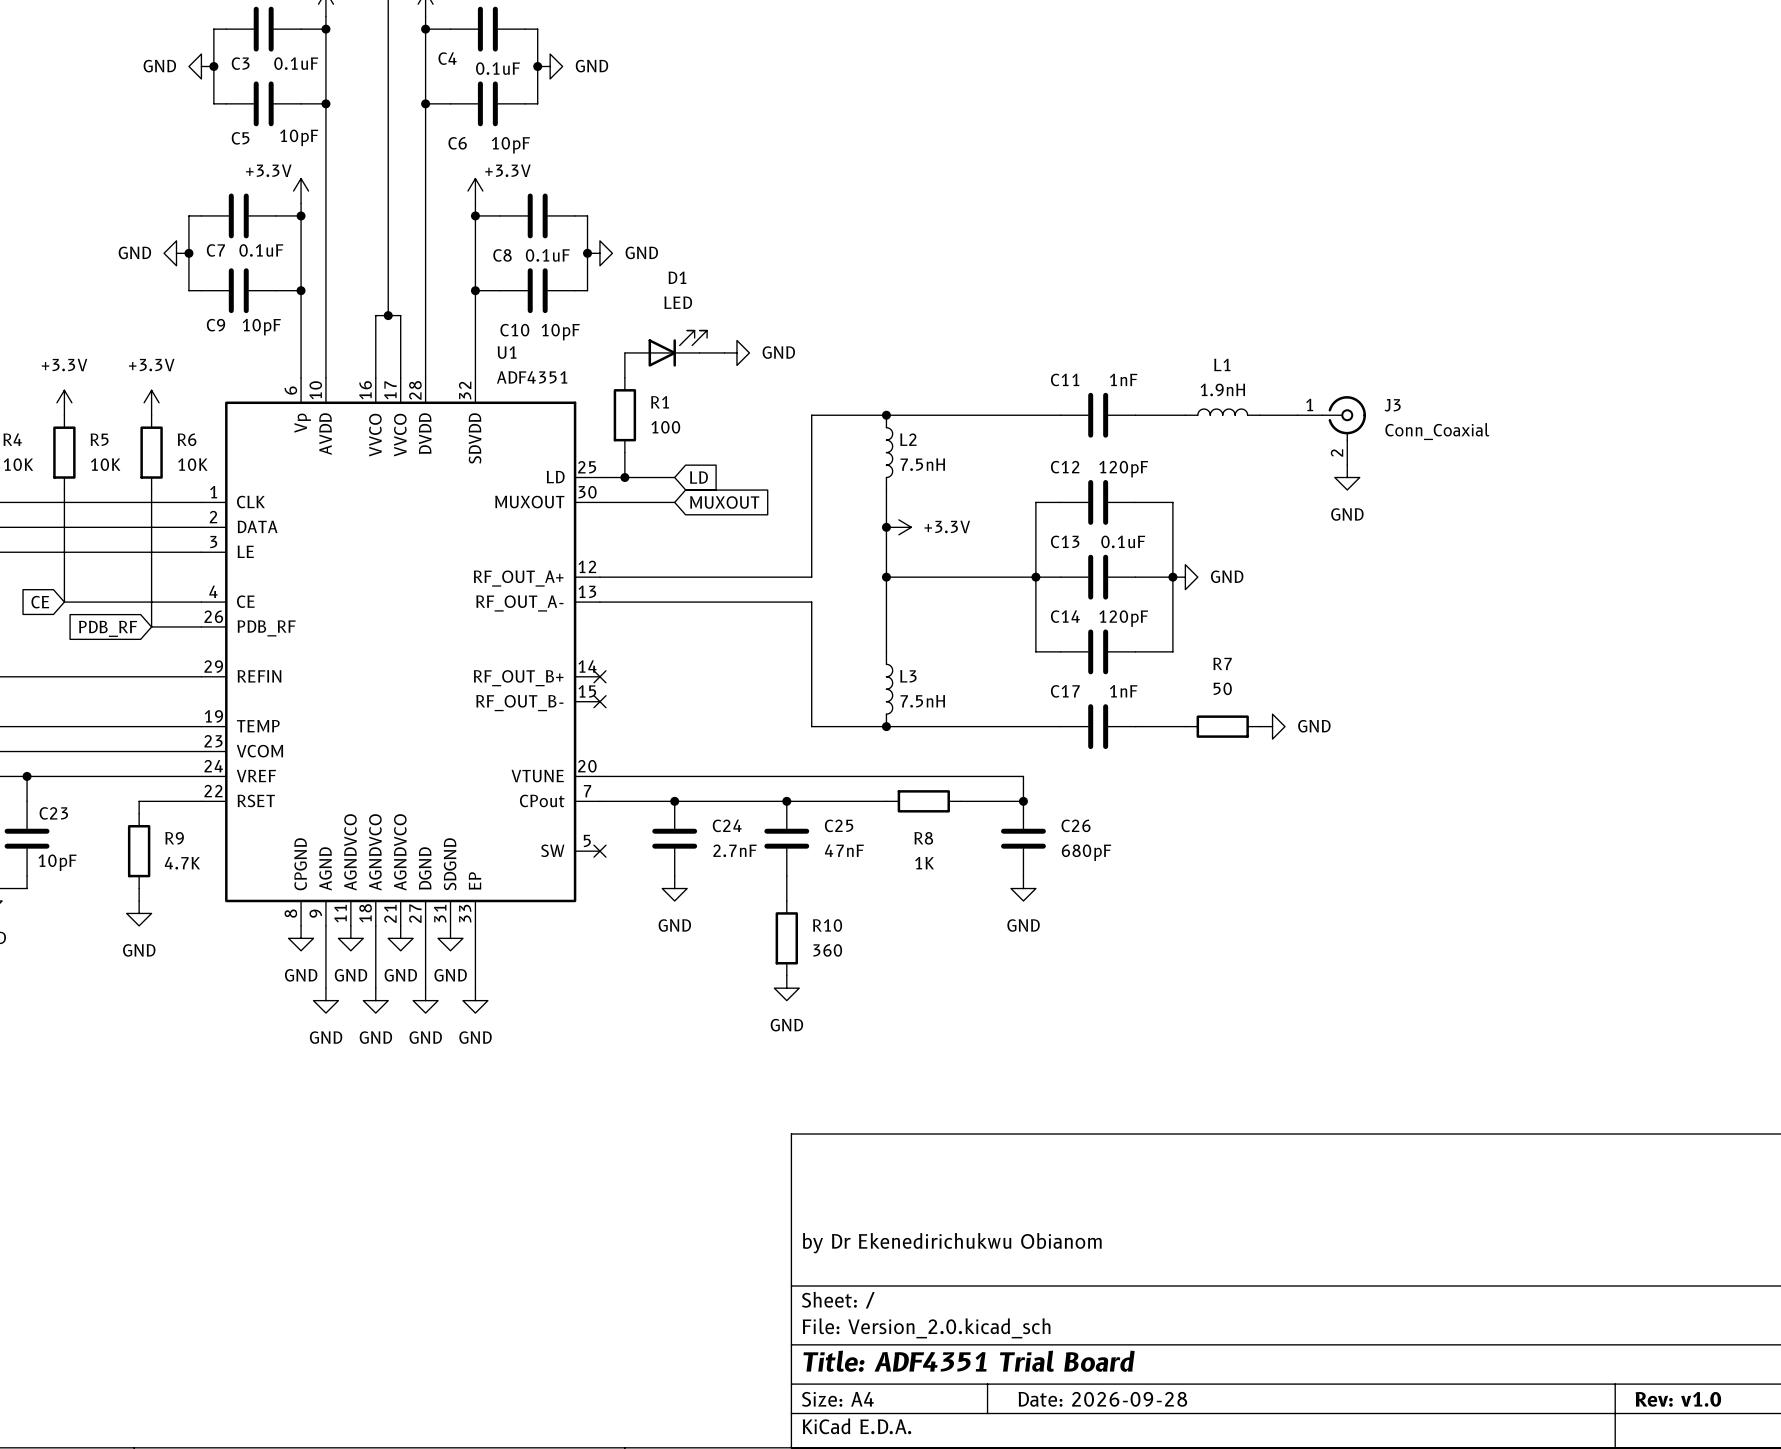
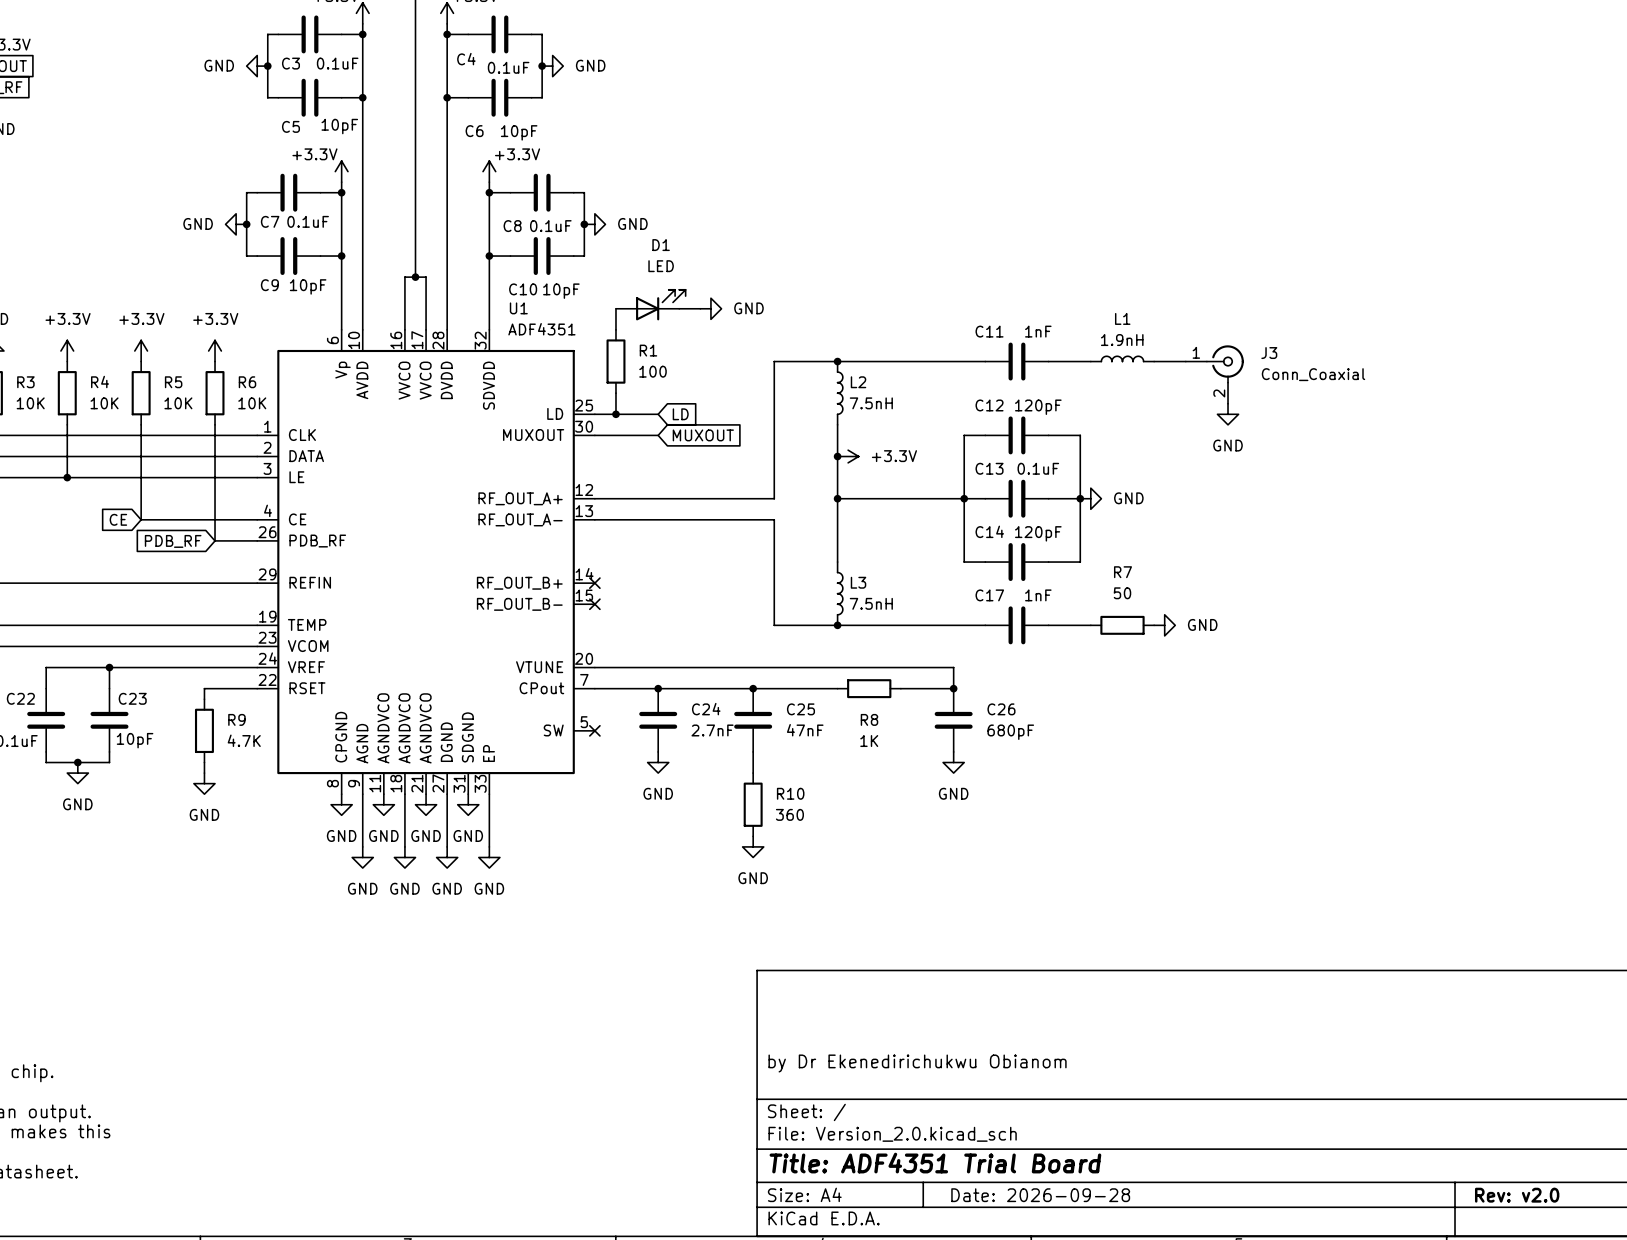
title block: Rev: v1.0 (1678, 1399) -> Rev: v2.0 (1517, 1195)

